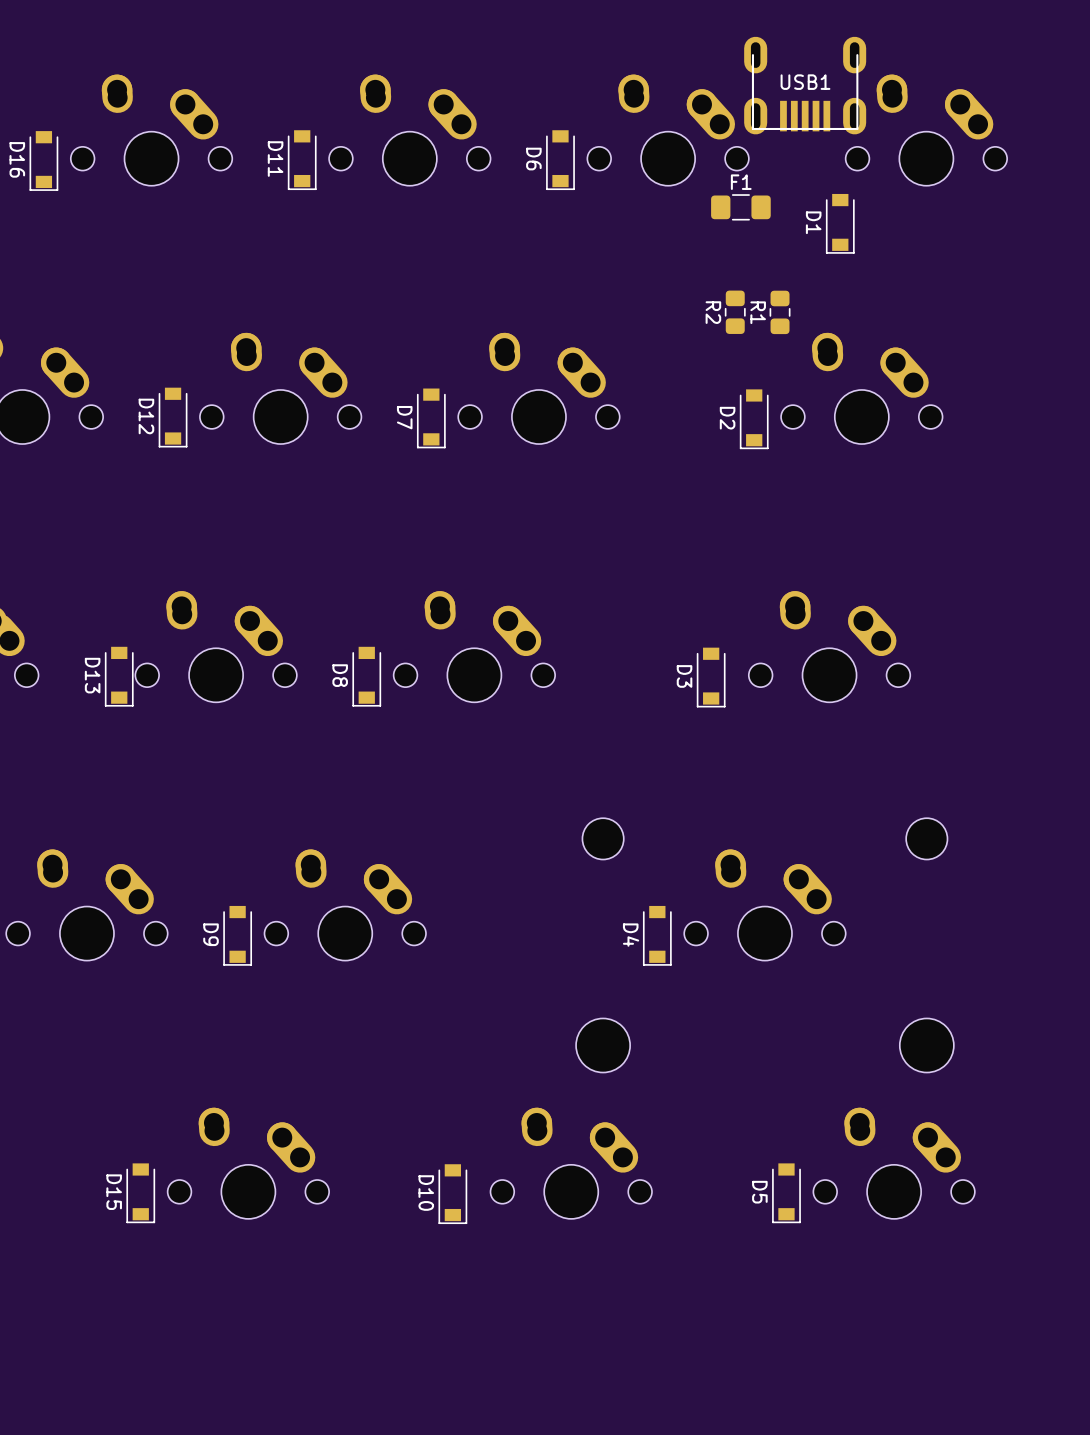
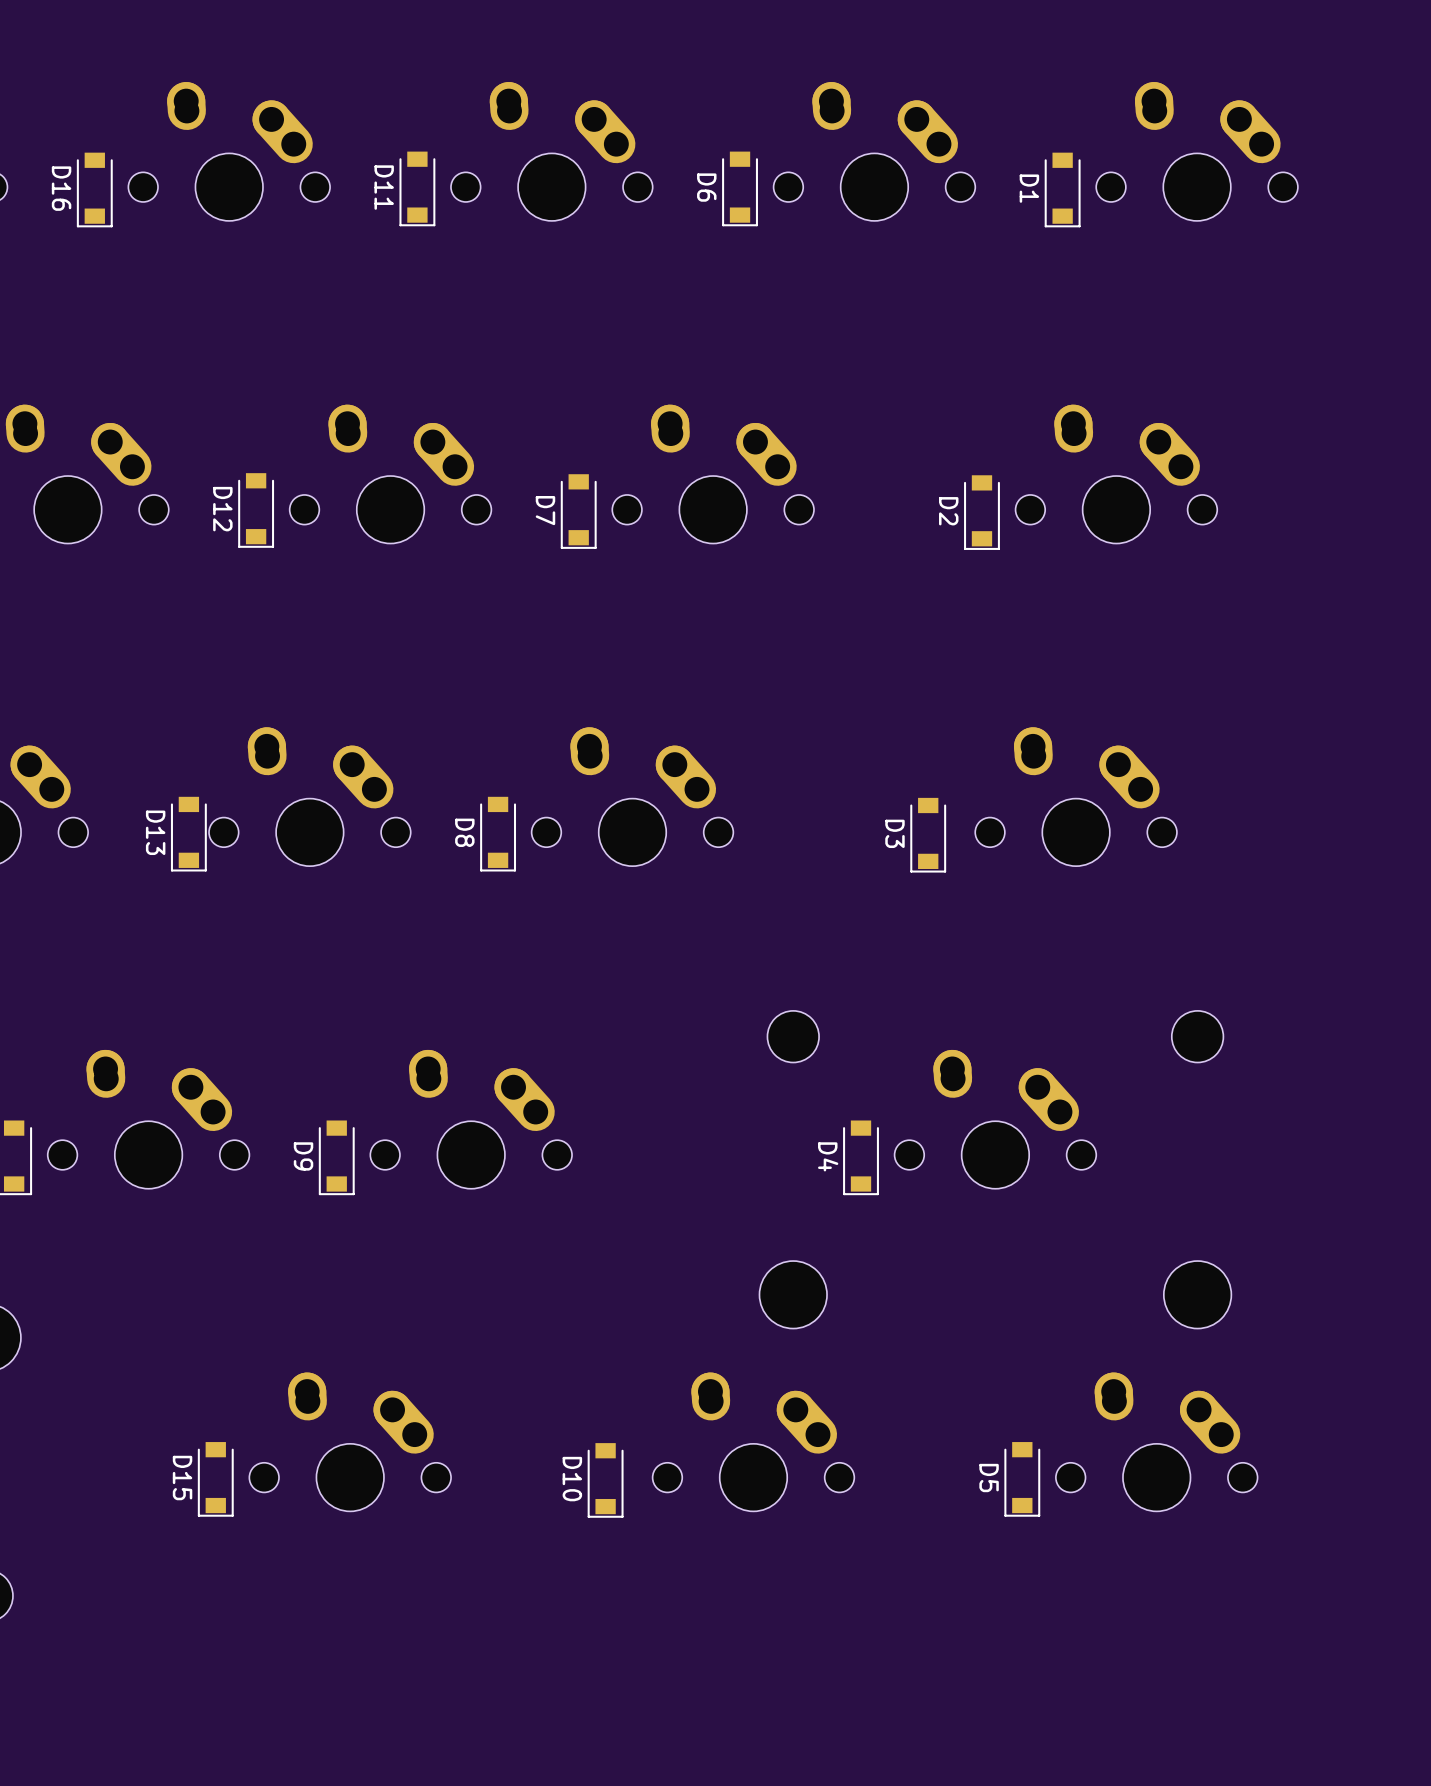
USB1: (805, 85) -> none
F1: (740, 207) -> none
D1 position: (840, 223) -> (1062, 190)
R2: (735, 312) -> none
R1: (780, 312) -> none

